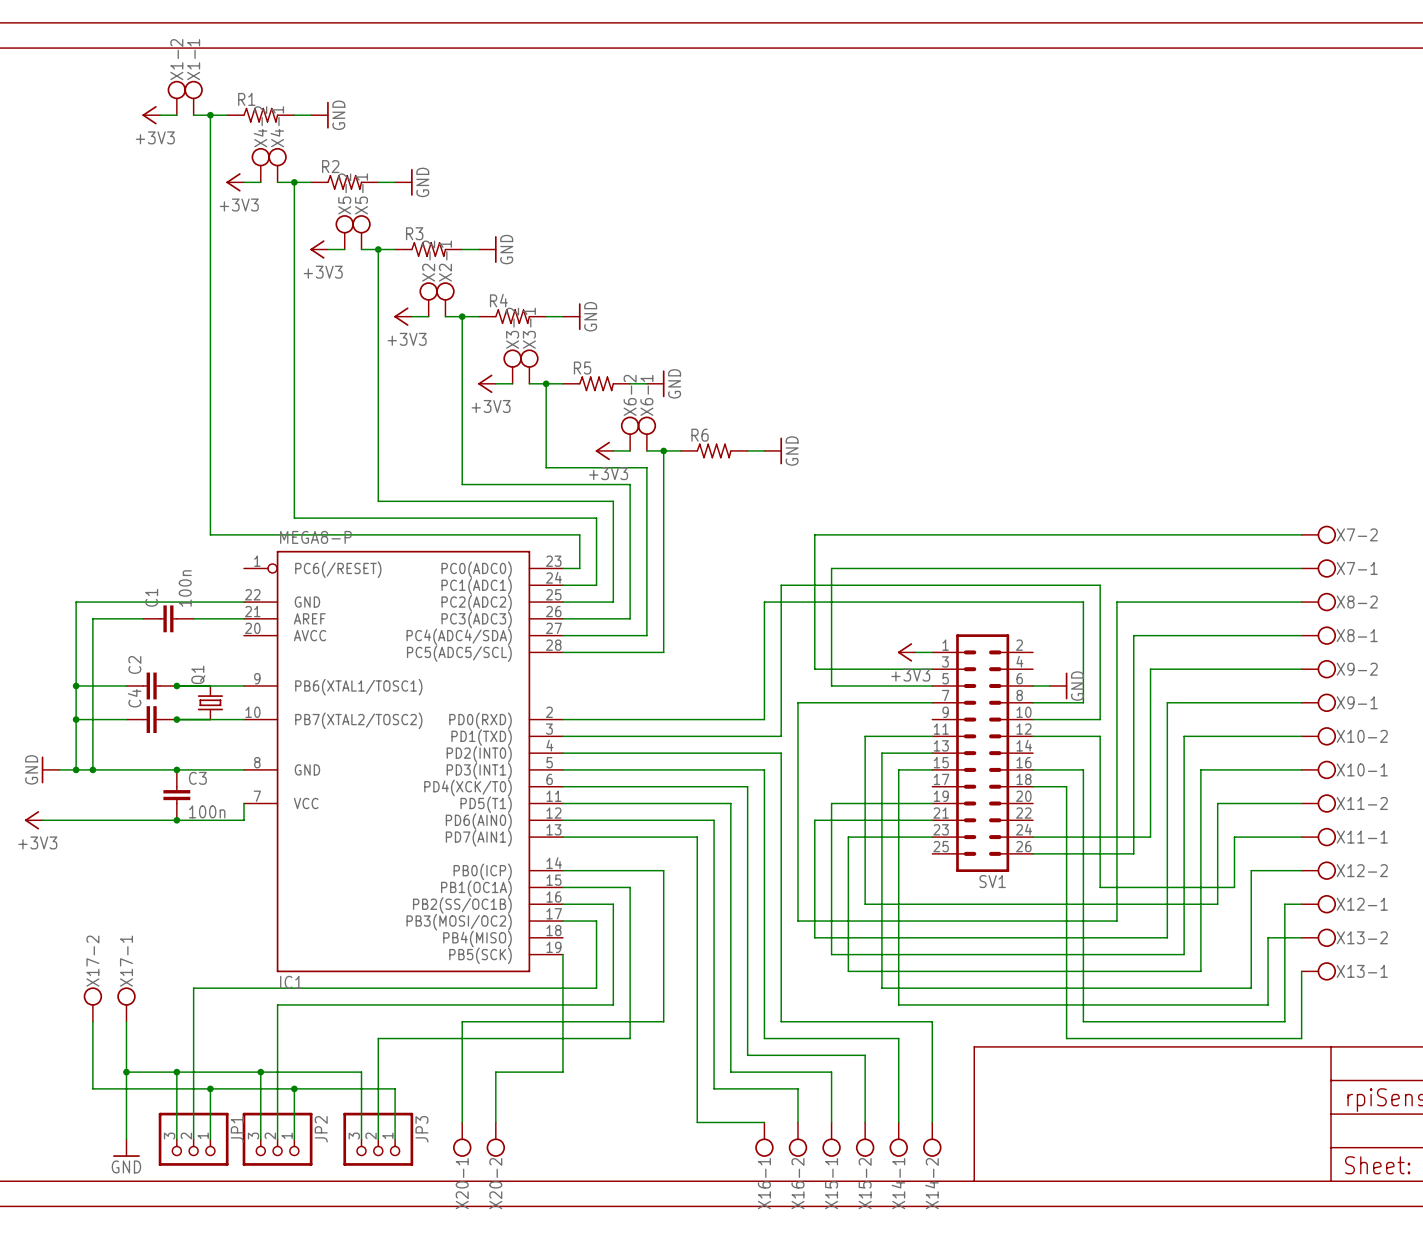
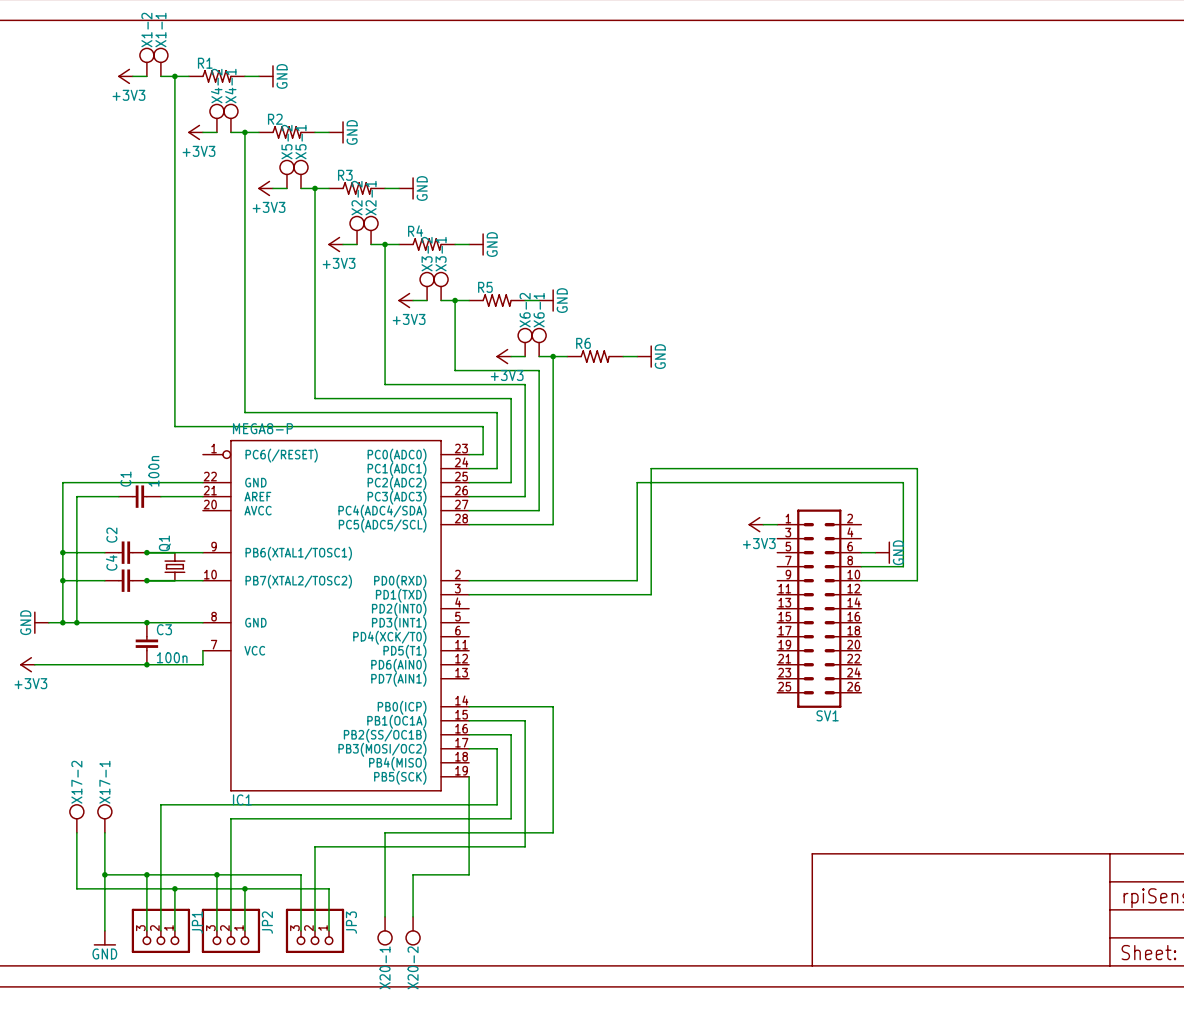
wire: (1301, 534) (814, 534) (814, 669) (932, 669) -> none
X7-2: (1318, 534) -> none
wire: (1301, 568) (831, 568) (831, 685) (932, 685) -> none
X7-1: (1318, 568) -> none
wire: (1301, 602) (1116, 602) (1116, 921) (797, 921) (797, 702) (932, 702) -> none
X8-2: (1318, 602) -> none
wire: (1301, 635) (1133, 635) (1133, 853) (1033, 853) -> none
X8-1: (1318, 635) -> none
wire: (1301, 669) (1150, 669) (1150, 837) (1033, 837) -> none
X9-2: (1318, 669) -> none
wire: (1301, 702) (1167, 702) (1167, 937) (814, 937) (814, 820) (932, 820) -> none
X9-1: (1318, 702) -> none
wire: (932, 736) (865, 736) (865, 904) (1217, 904) (1217, 803) (1301, 803) -> none
wire: (1033, 736) (1100, 736) (1100, 887) (1234, 887) (1234, 837) (1301, 837) -> none
wire: (1301, 736) (1184, 736) (1184, 954) (831, 954) (831, 803) (932, 803) -> none
X10-2: (1318, 736) -> none
wire: (562, 753) (781, 753) (781, 1021) (932, 1021) (932, 1122) -> none
wire: (932, 753) (881, 753) (881, 988) (1251, 988) (1251, 870) (1301, 870) -> none
wire: (562, 769) (764, 769) (764, 1038) (898, 1038) (898, 1122) -> none
wire: (932, 769) (898, 769) (898, 1004) (1268, 1004) (1268, 937) (1301, 937) -> none
wire: (1033, 769) (1083, 769) (1083, 1021) (1284, 1021) (1284, 904) (1301, 904) -> none
wire: (1301, 769) (1200, 769) (1200, 971) (848, 971) (848, 837) (932, 837) -> none
X10-1: (1318, 769) -> none
wire: (562, 786) (747, 786) (747, 1055) (865, 1055) (865, 1122) -> none
wire: (1033, 786) (1066, 786) (1066, 1038) (1301, 1038) (1301, 971) -> none
wire: (562, 803) (730, 803) (730, 1072) (831, 1072) (831, 1122) -> none
X11-2: (1318, 803) -> none
wire: (562, 820) (714, 820) (714, 1088) (797, 1088) (797, 1122) -> none
wire: (562, 837) (697, 837) (697, 1122) (764, 1122) -> none
X11-1: (1318, 837) -> none
X12-2: (1318, 870) -> none
X12-1: (1318, 904) -> none
X13-2: (1318, 937) -> none
X13-1: (1318, 971) -> none
X16-1: (764, 1139) -> none
X16-2: (797, 1139) -> none
X15-1: (831, 1139) -> none
X15-2: (865, 1139) -> none
X14-1: (898, 1139) -> none
X14-2: (932, 1139) -> none

